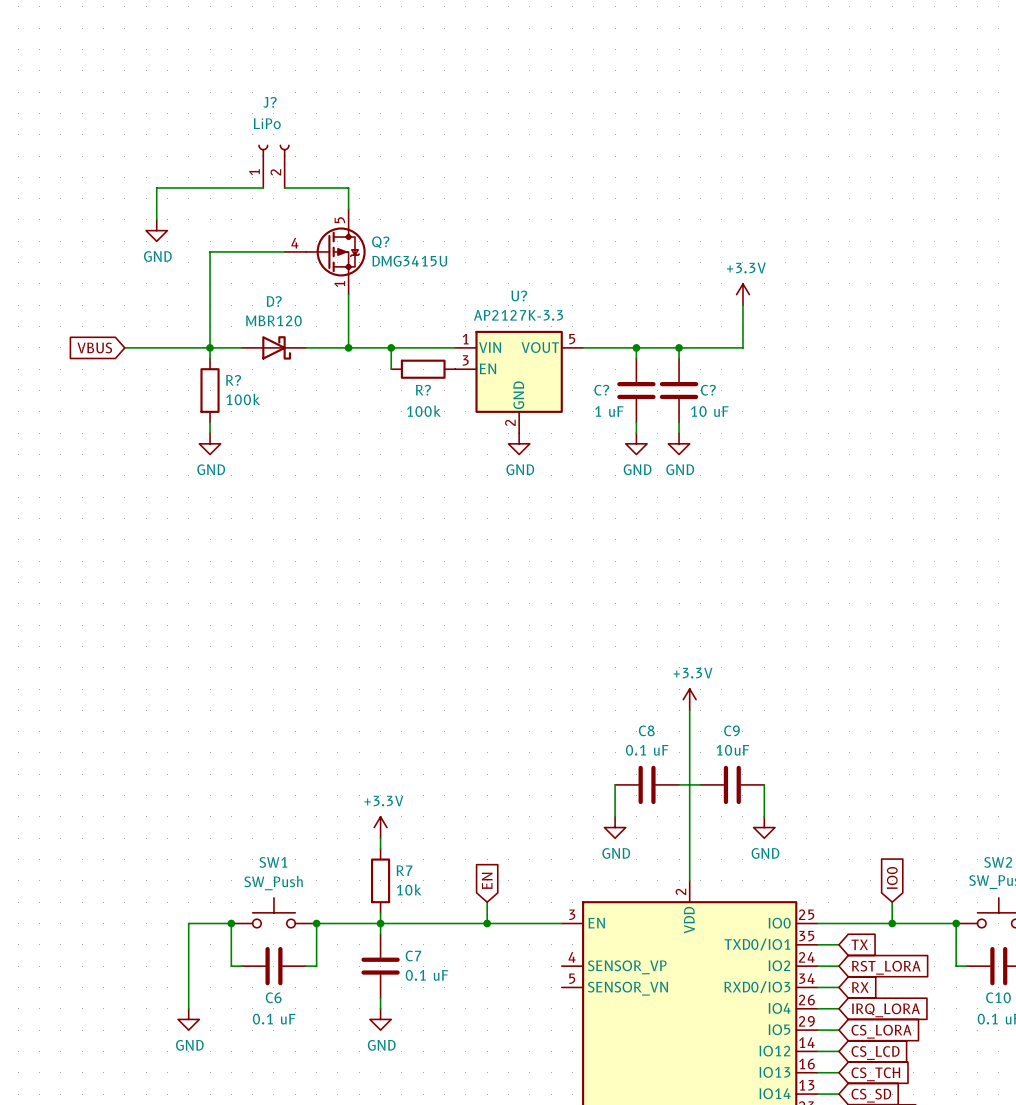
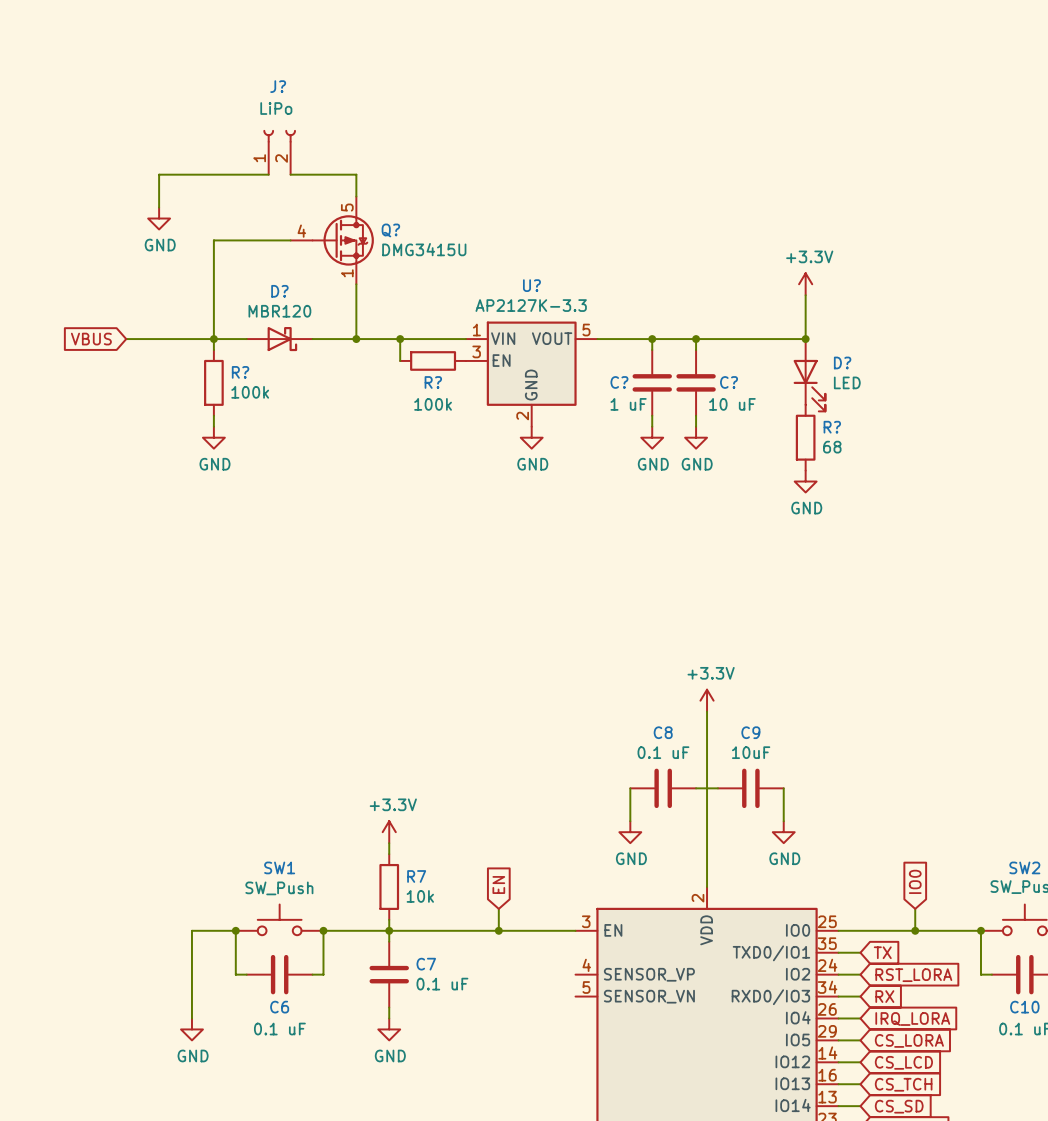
power symbol position: +3.3V (742, 294) -> +3.3V (805, 284)
wire: (742, 305) (742, 347) -> (805, 295) (805, 339) (761, 339)
junction: none -> (805, 339)
D?: none -> LED (809, 375)
R?: none -> 68 (805, 437)
power symbol: none -> GND (805, 481)

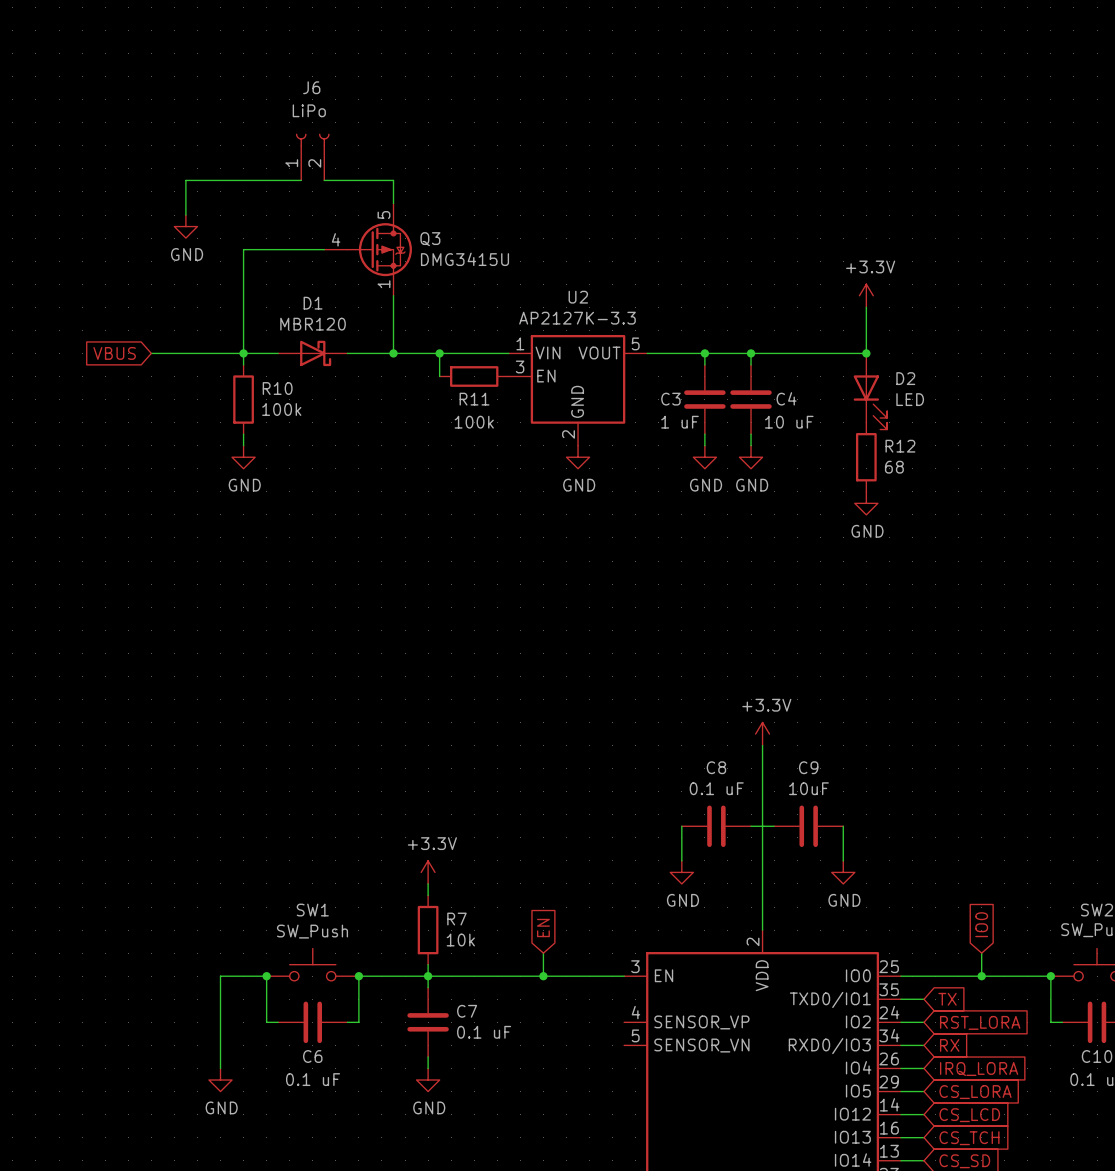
J? name: J? (278, 86) -> J6 (311, 87)
Q? name: Q? (390, 230) -> Q3 (430, 239)
U? name: U? (531, 285) -> U2 (578, 297)
D? name: D? (279, 291) -> D1 (313, 303)
D? name: D? (842, 362) -> D2 (905, 378)
R? name: R? (240, 372) -> R10 (277, 388)
R? name: R? (433, 382) -> R11 (474, 399)
C? name: C? (619, 382) -> C3 (670, 399)
C? name: C? (729, 382) -> C4 (786, 398)
R? name: R? (832, 427) -> R12 (900, 446)

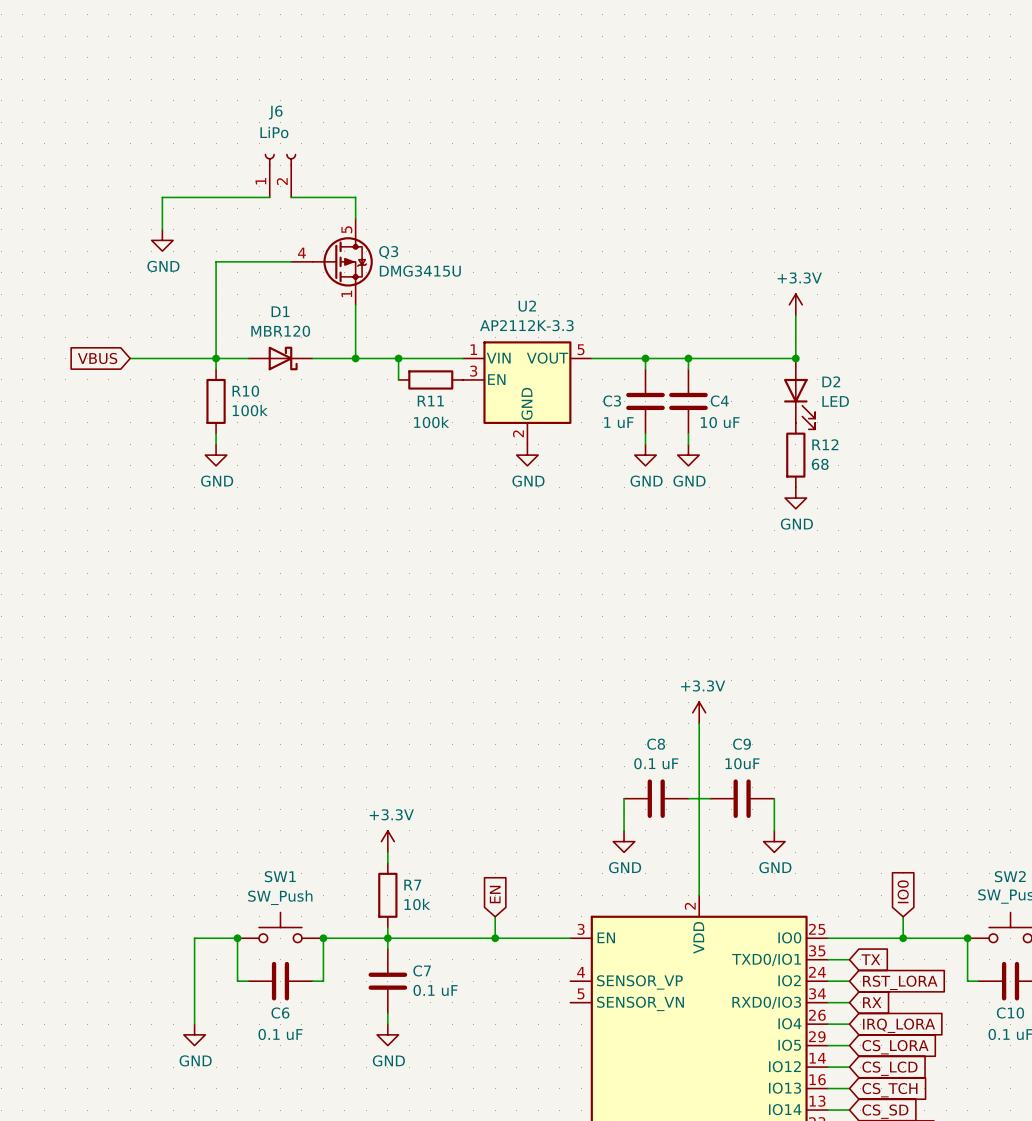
U2 value: AP2127K-3.3 (577, 318) -> AP2112K-3.3 (526, 325)

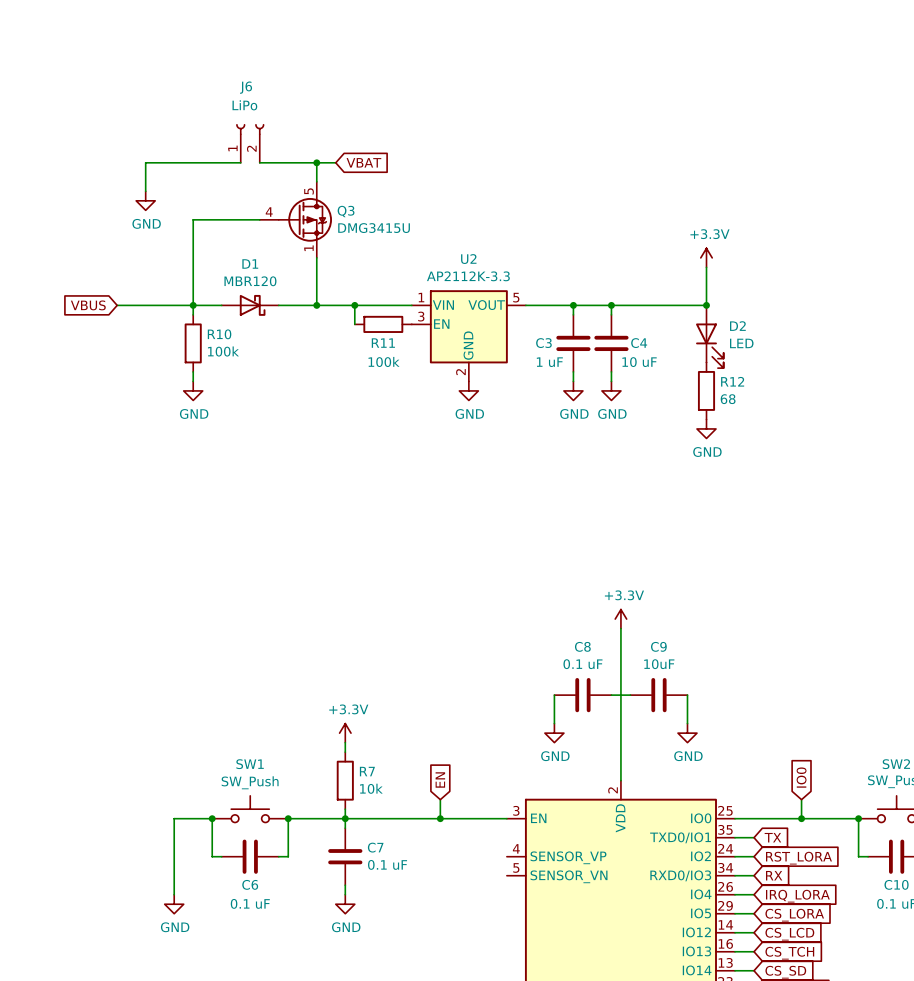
wire: none -> (316, 162) (335, 162)
junction: none -> (316, 162)
global label: none -> VBAT (363, 162)

